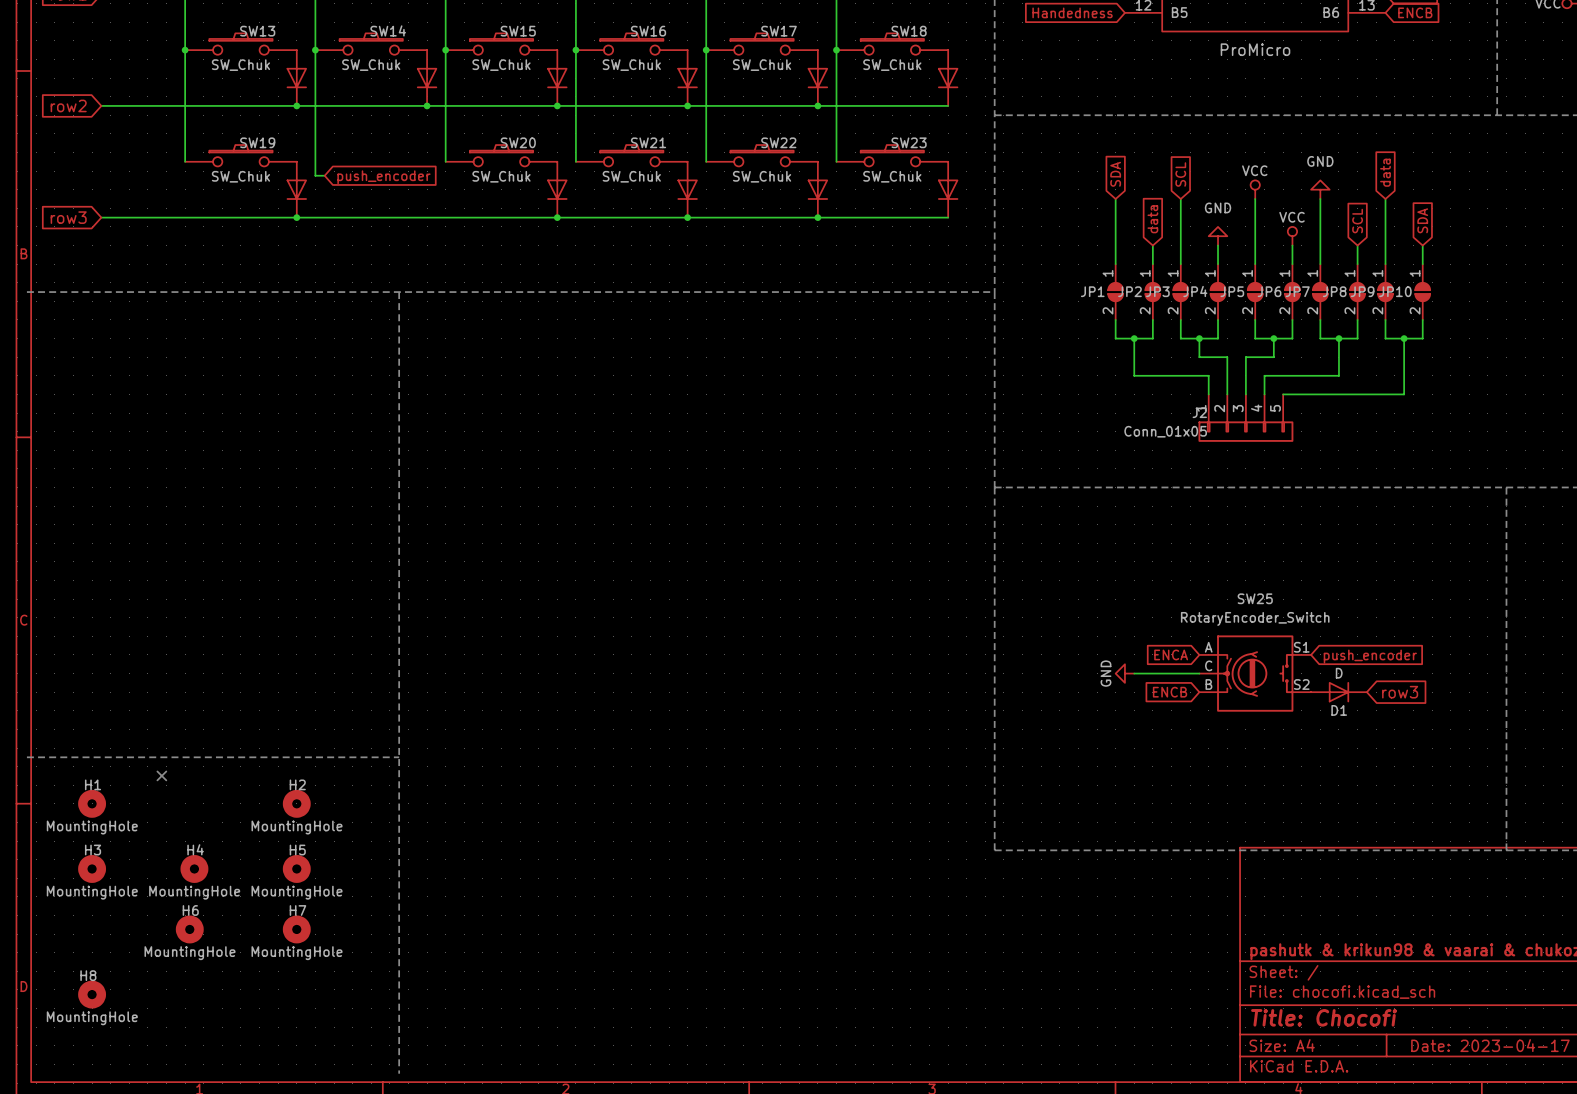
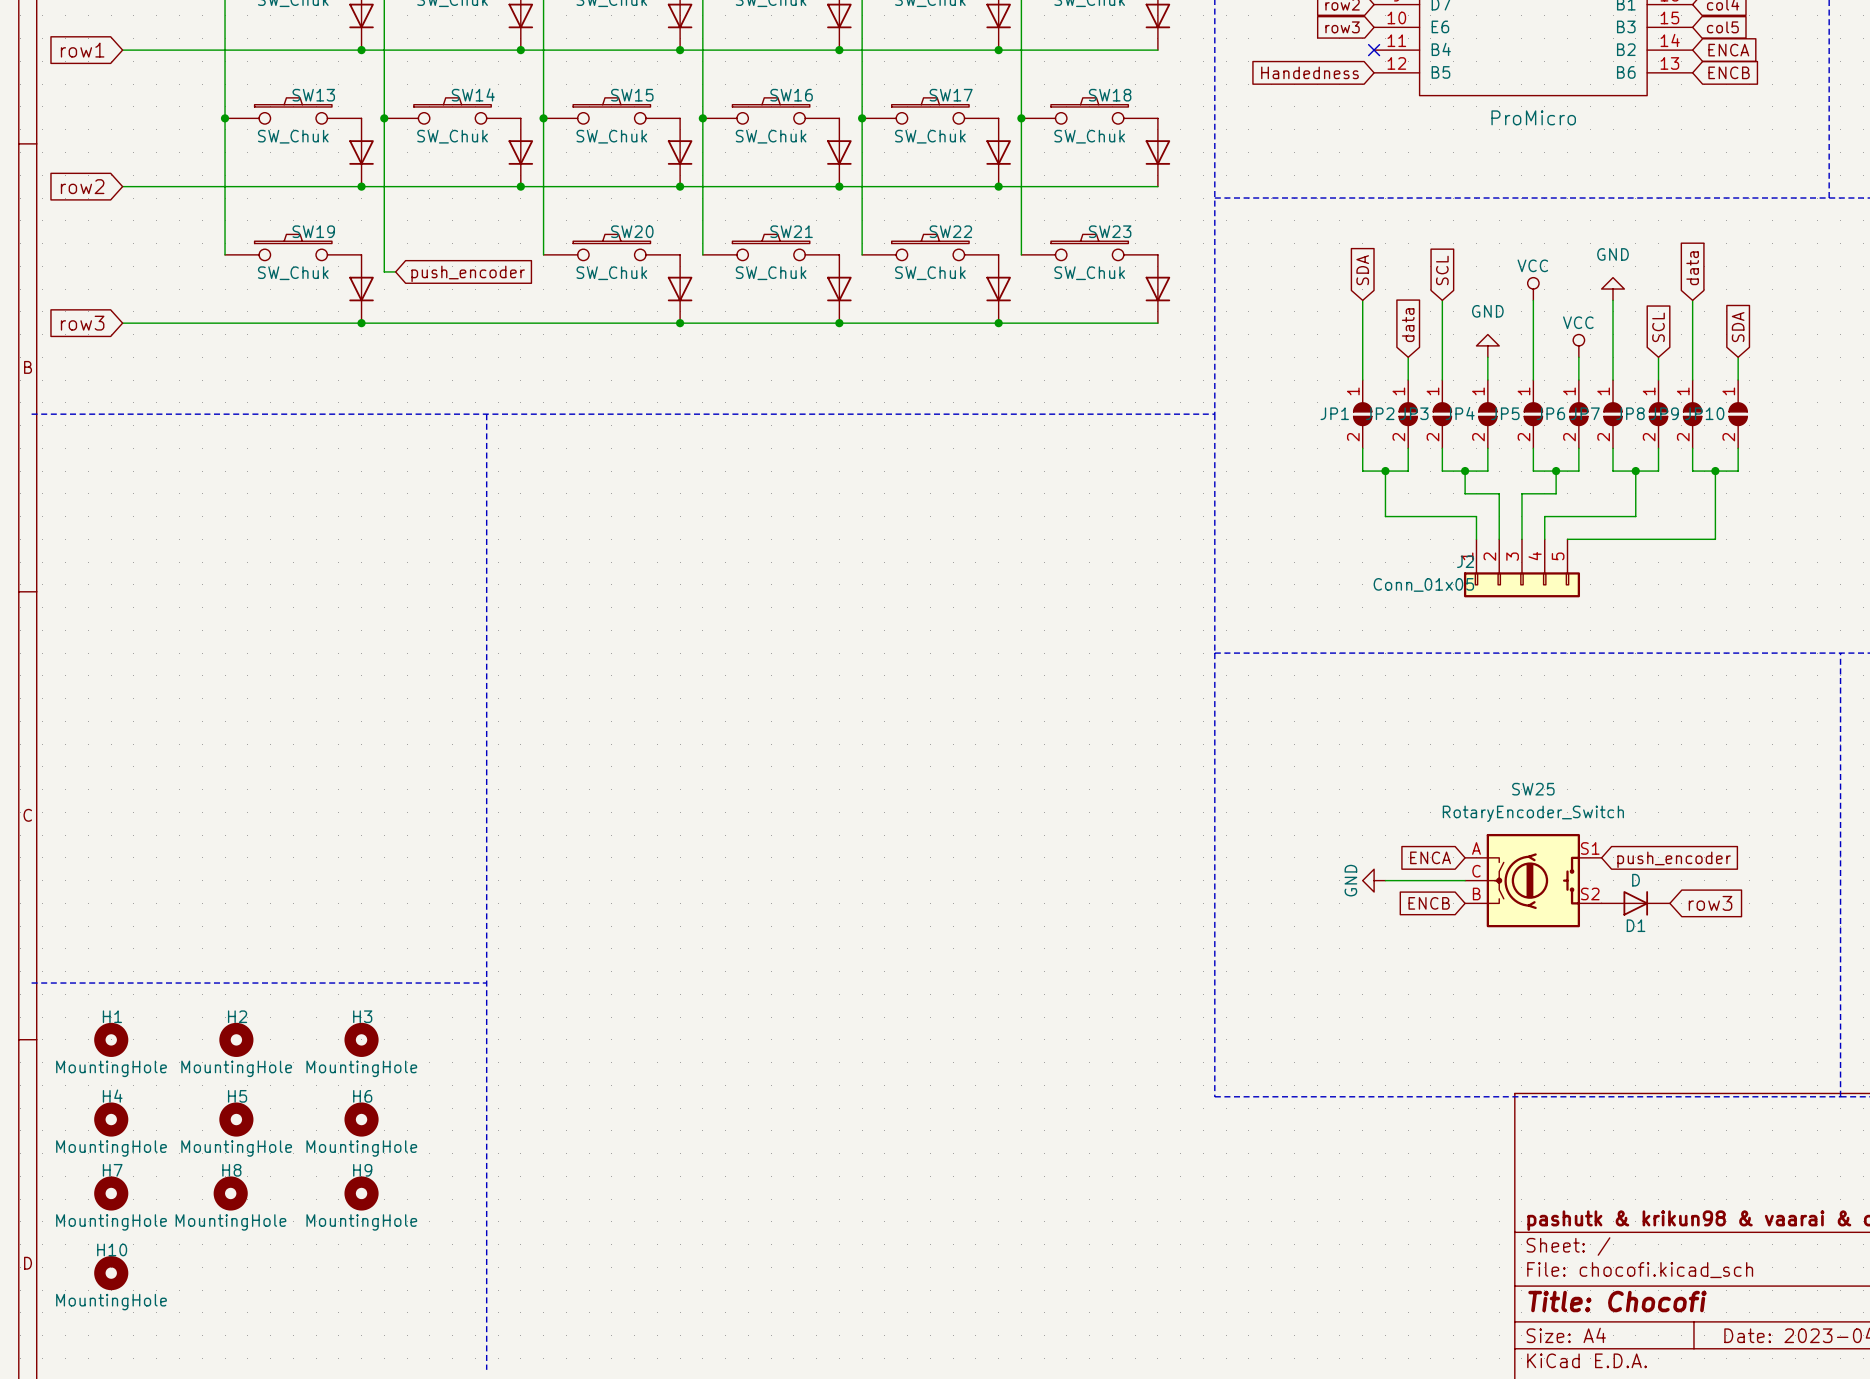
no-connect mark: (161, 775) -> none
H2 name: H2 (297, 784) -> H3 (362, 1016)
H2: none -> MountingHole (236, 1039)
H4 name: H4 (195, 849) -> H5 (237, 1096)
H3 name: H3 (93, 850) -> H4 (112, 1096)
H5 name: H5 (297, 850) -> H6 (362, 1096)
H6 name: H6 (190, 910) -> H8 (231, 1170)
H7 name: H7 (297, 910) -> H9 (362, 1170)
H7: none -> MountingHole (111, 1193)
H8 name: H8 (88, 975) -> H10 (112, 1249)

